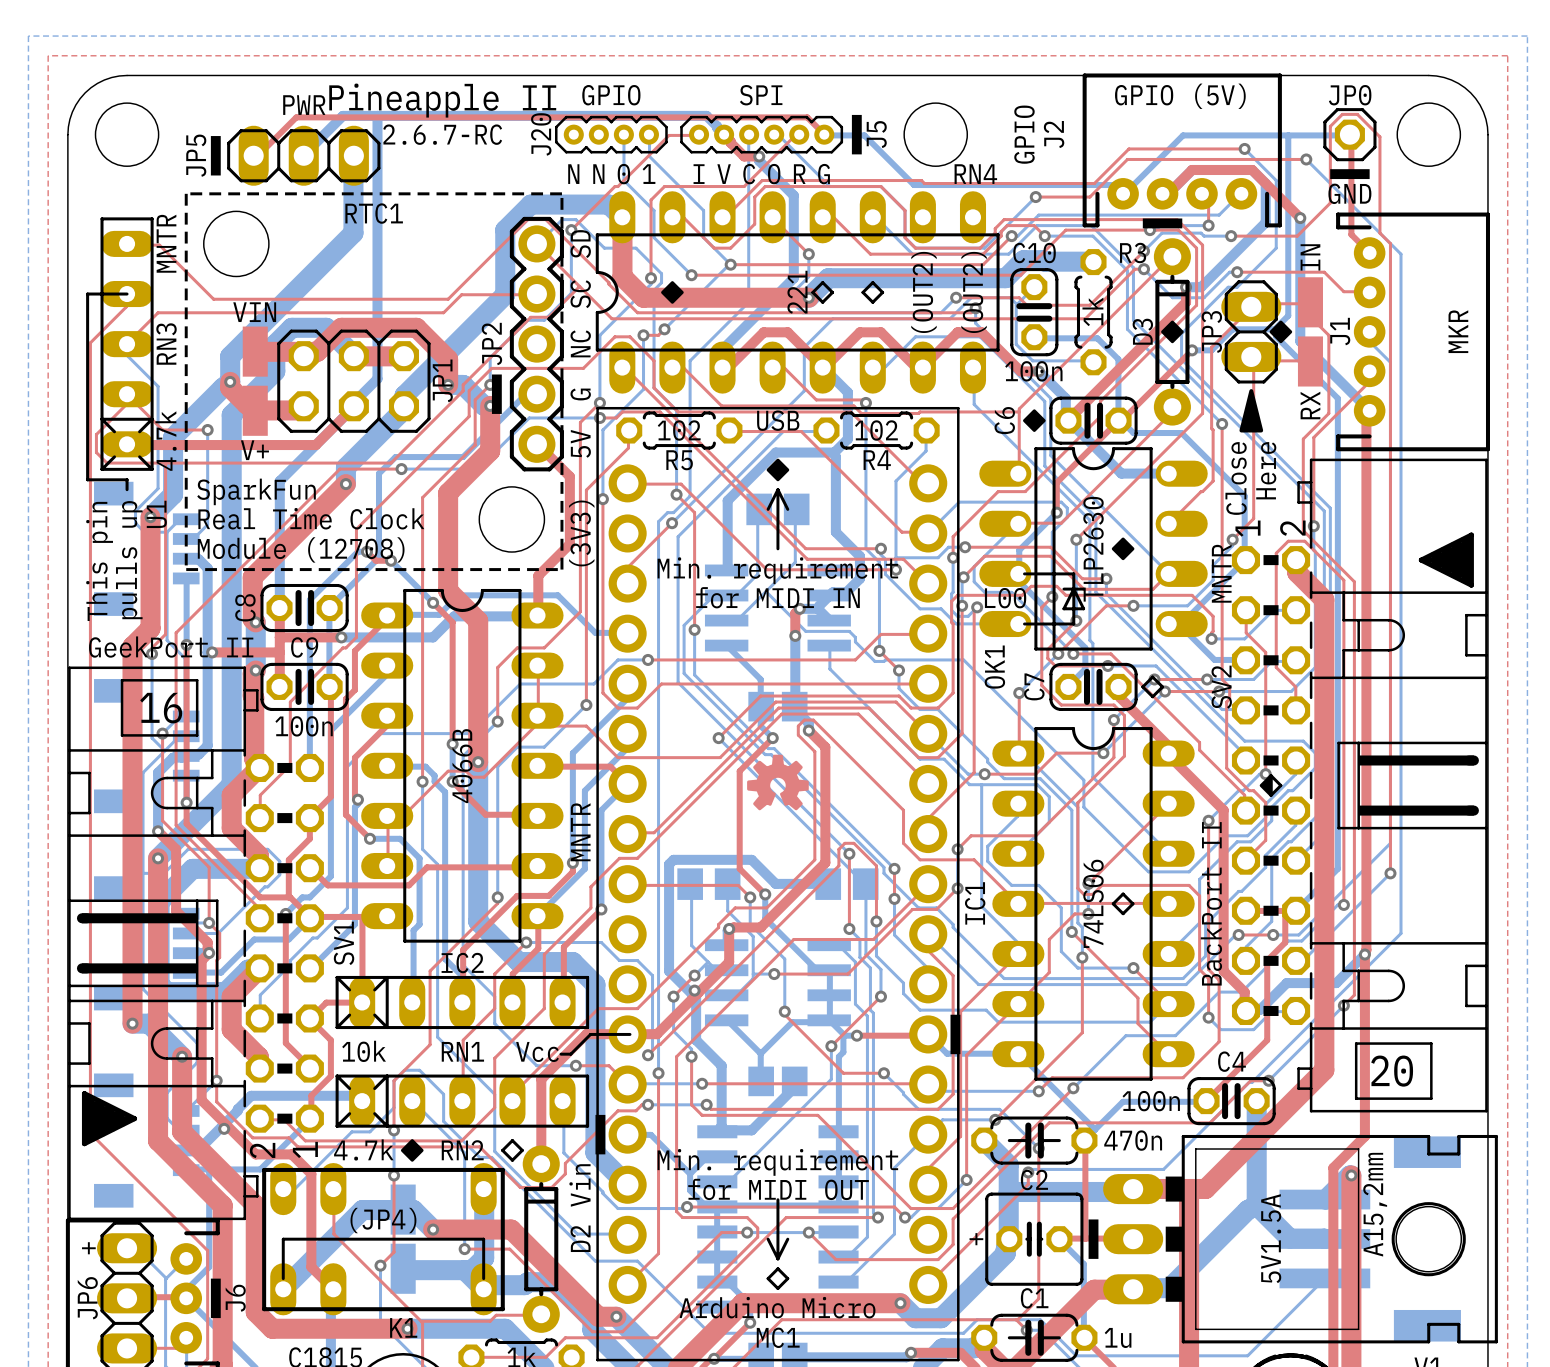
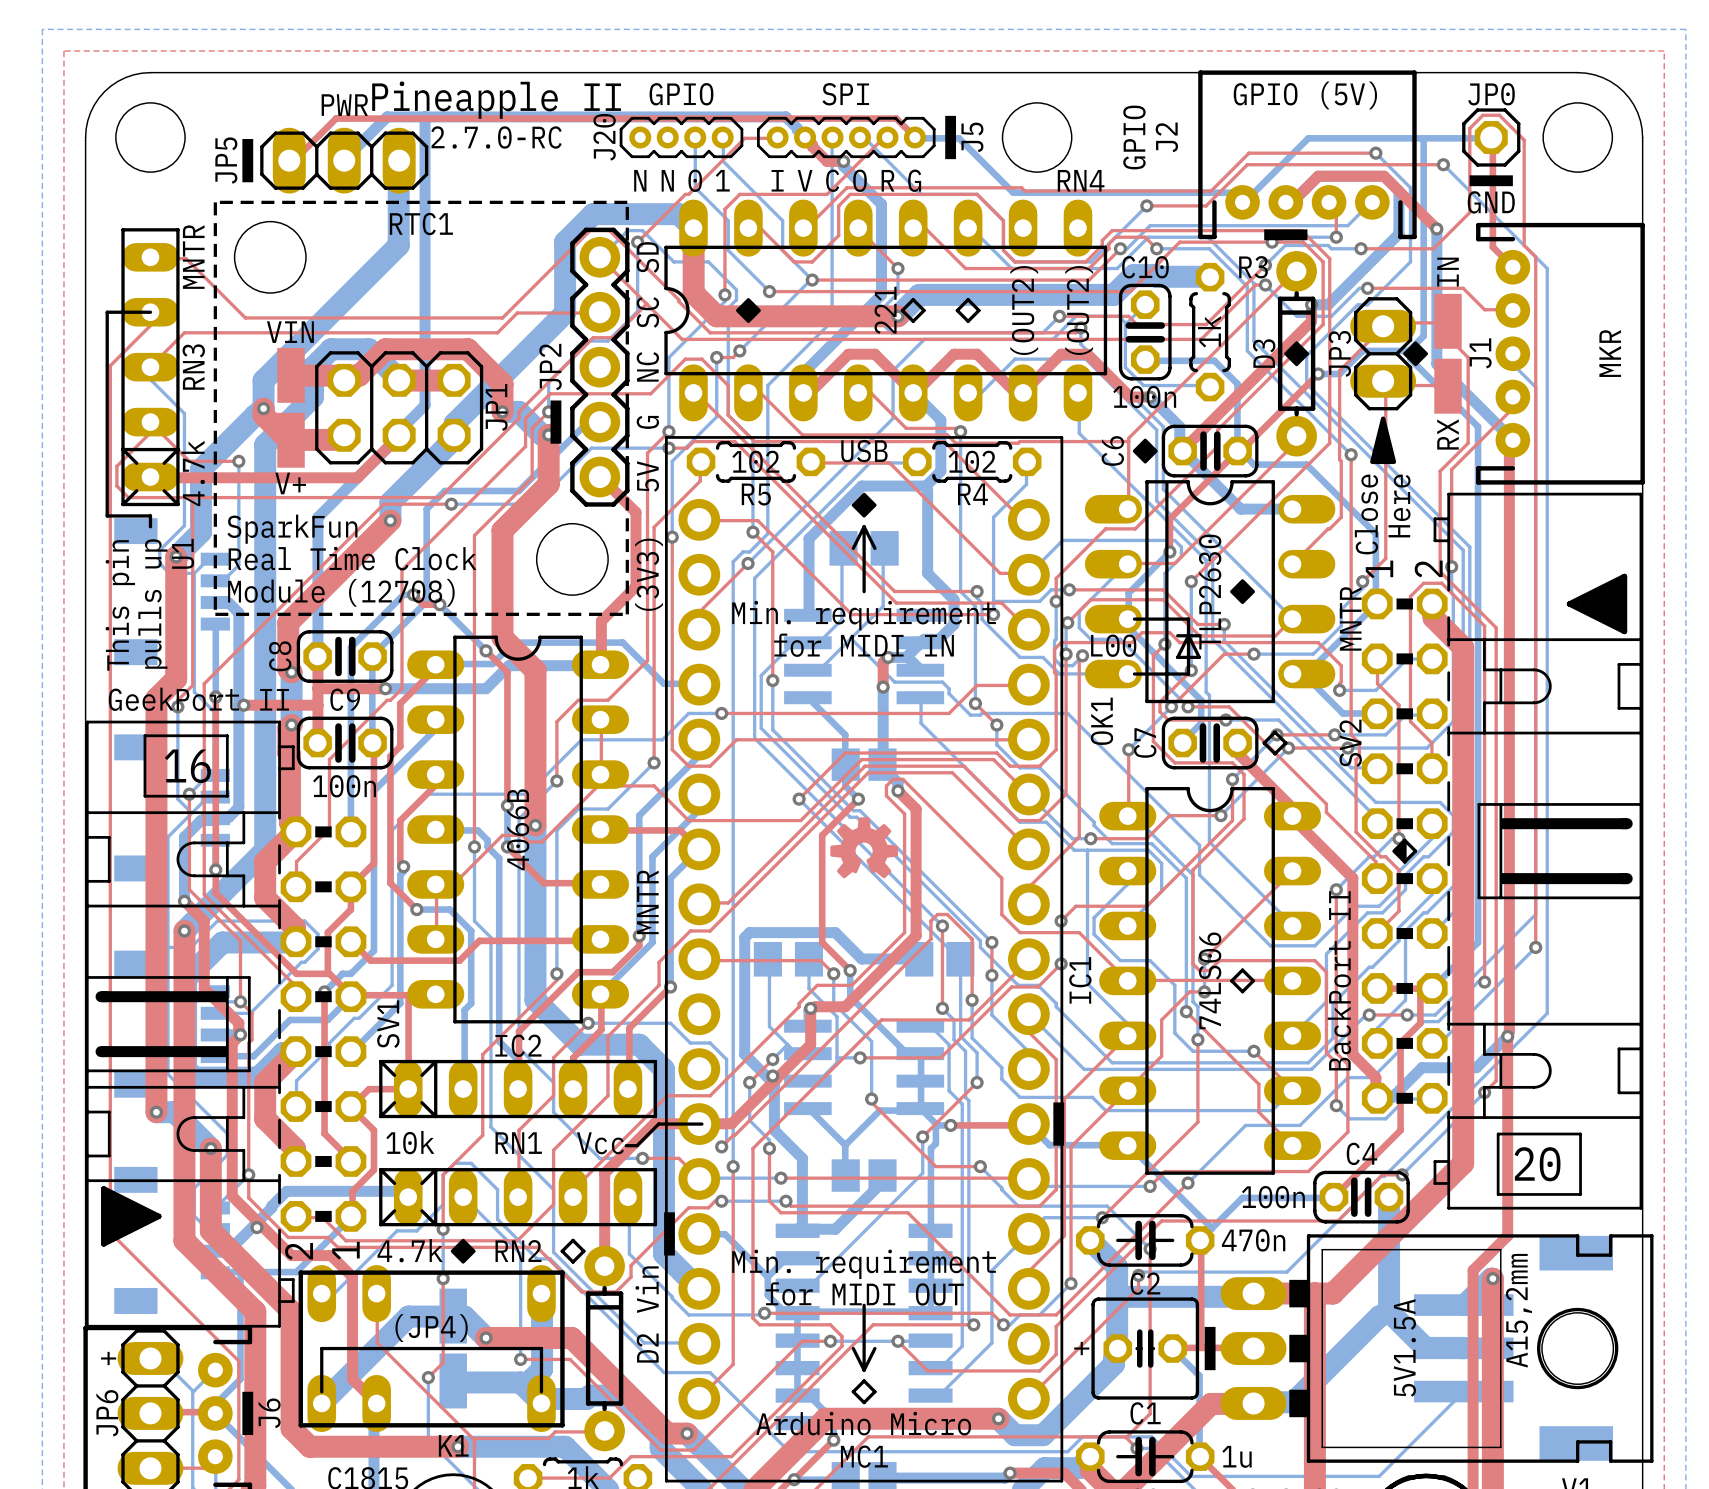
text: 2.6.7-RC (442, 134) -> 2.7.0-RC (496, 137)

